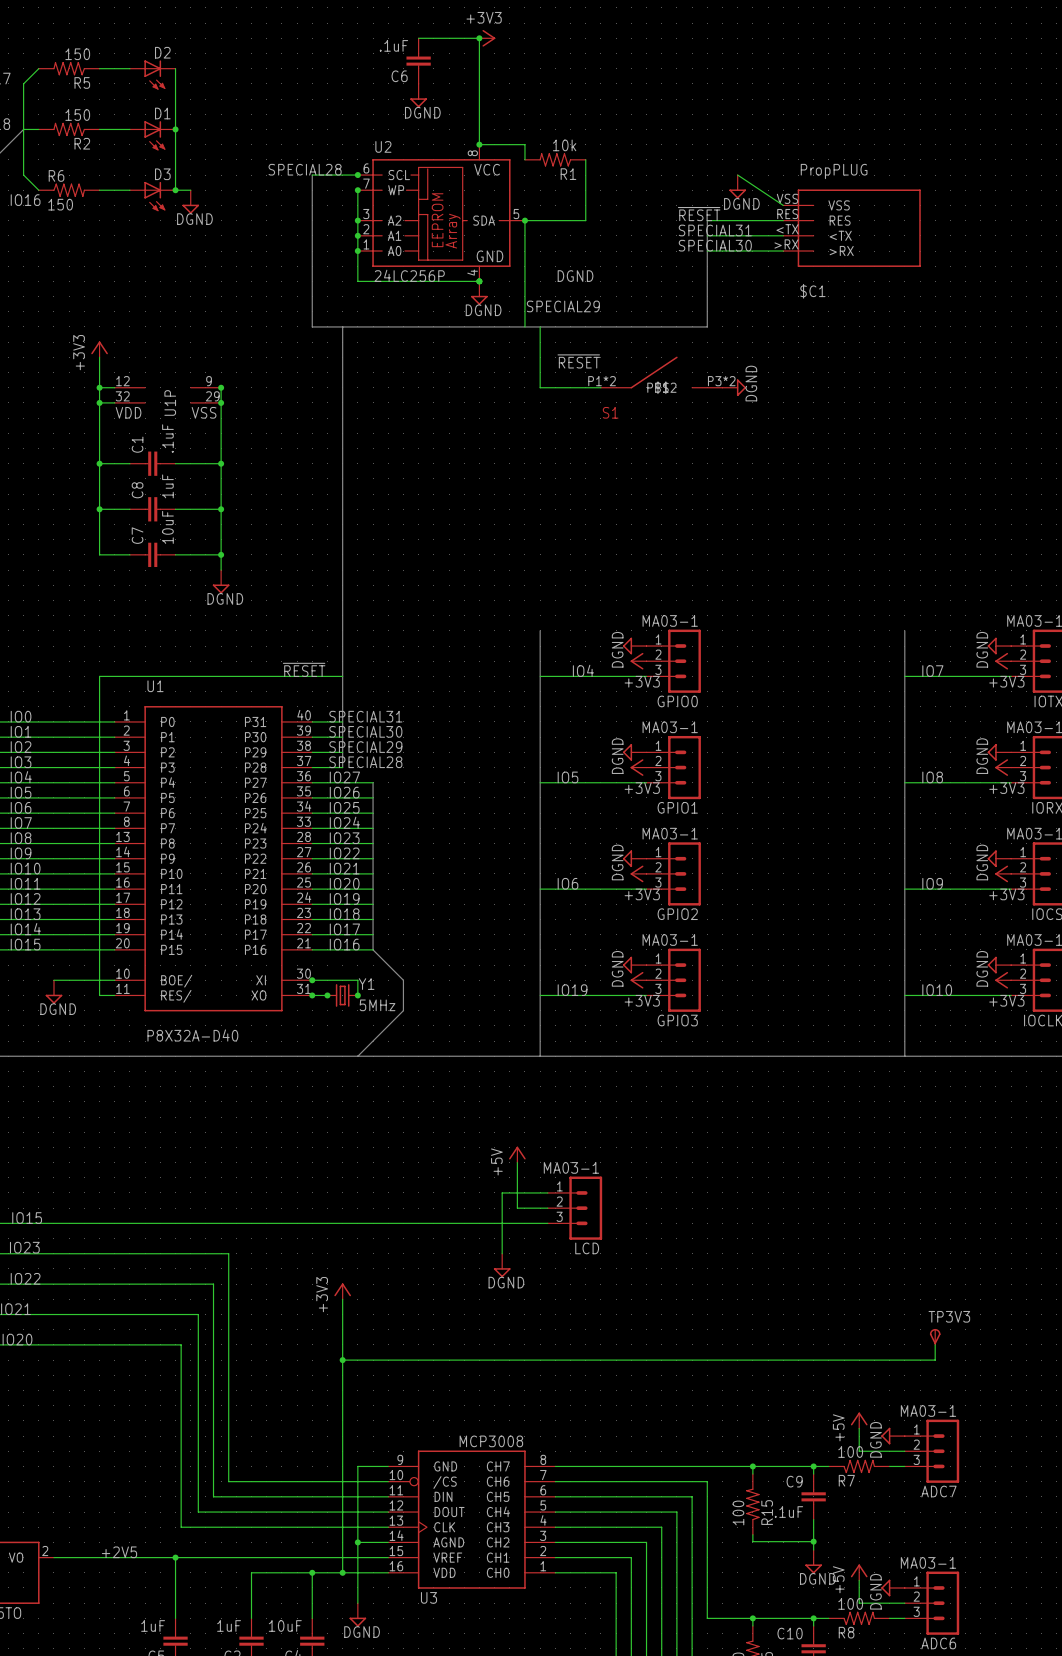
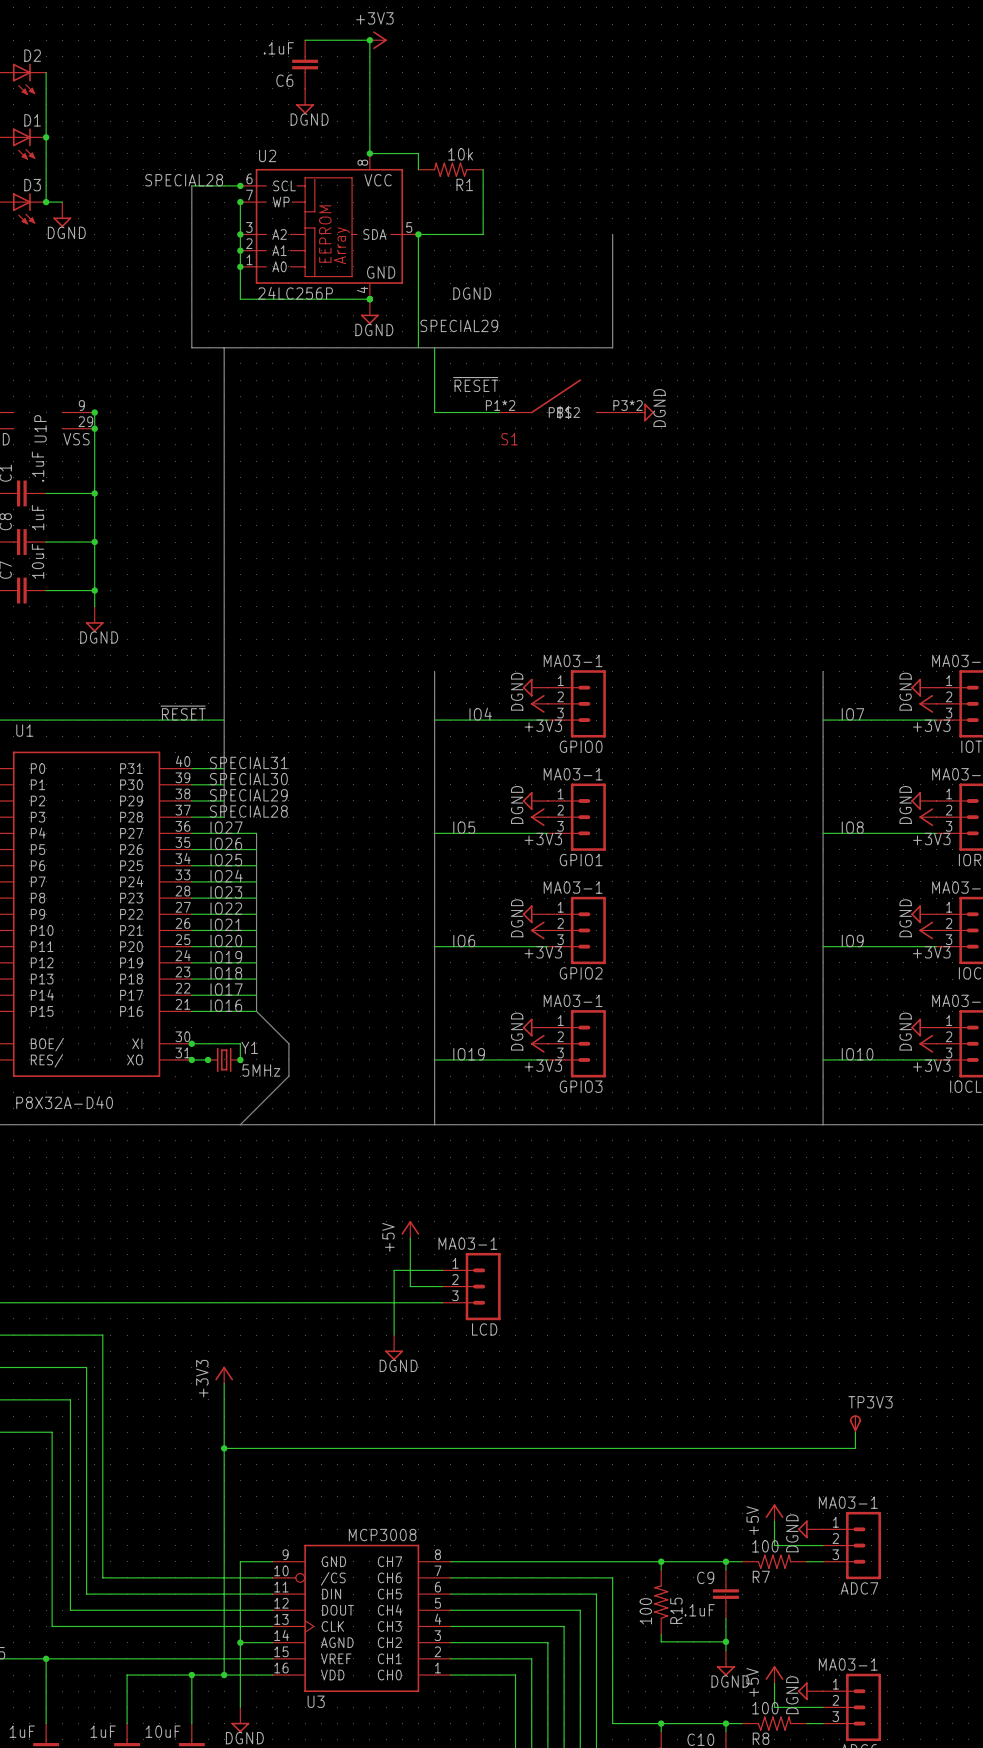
wire: (737, 175) (783, 205) -> none
power symbol: DGND (737, 186) -> none
label: ~{RESET} (699, 214) -> none
wire: (707, 220) (783, 220) -> none
part: (852, 228) -> none
label: SPECIAL31 (715, 230) -> none
wire: (707, 235) (783, 235) -> none
label: SPECIAL30 (715, 245) -> none
wire: (707, 251) (783, 251) -> none

